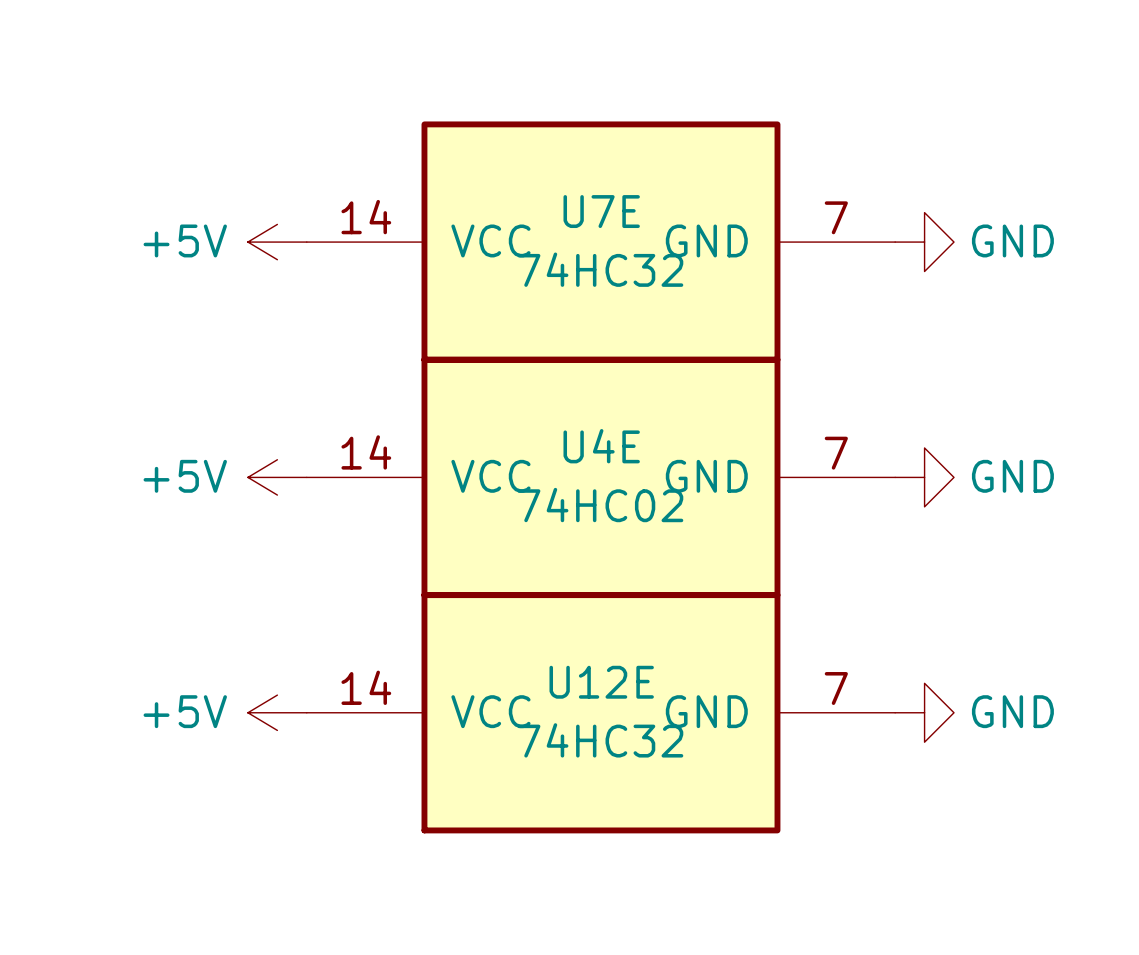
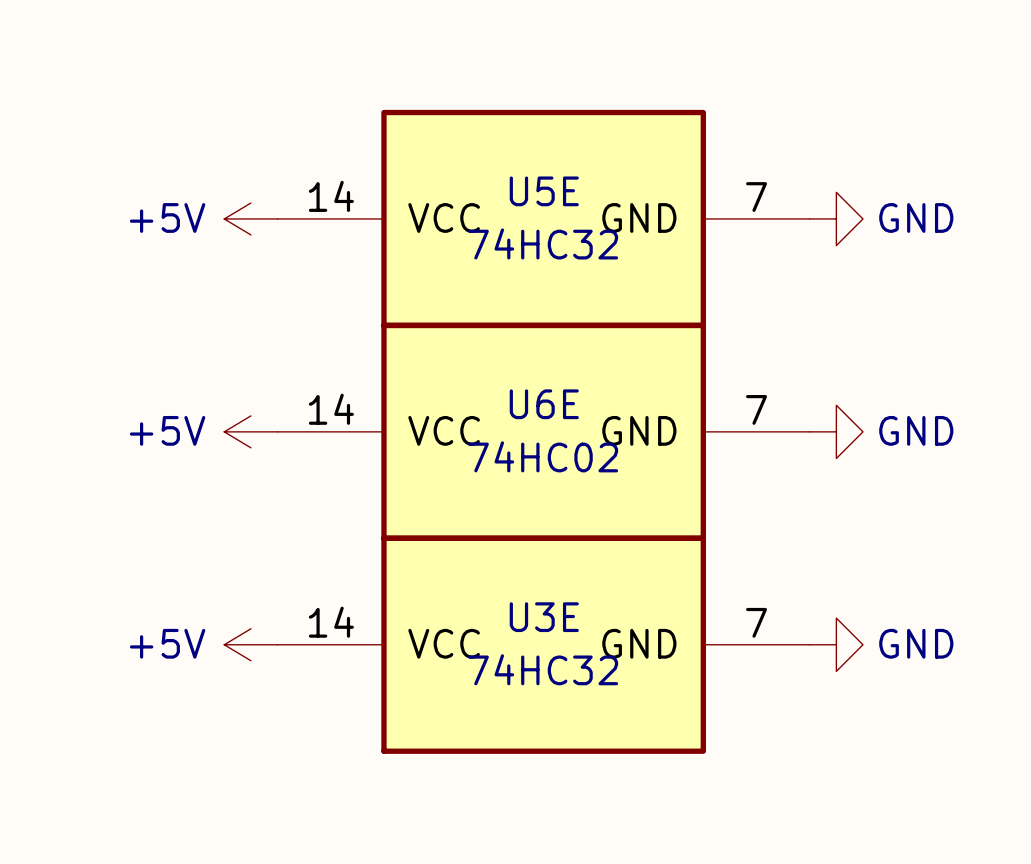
U7E name: U7E (601, 211) -> U5E (544, 191)
U4E name: U4E (601, 446) -> U6E (544, 404)
U12E name: U12E (601, 682) -> U3E (544, 617)

